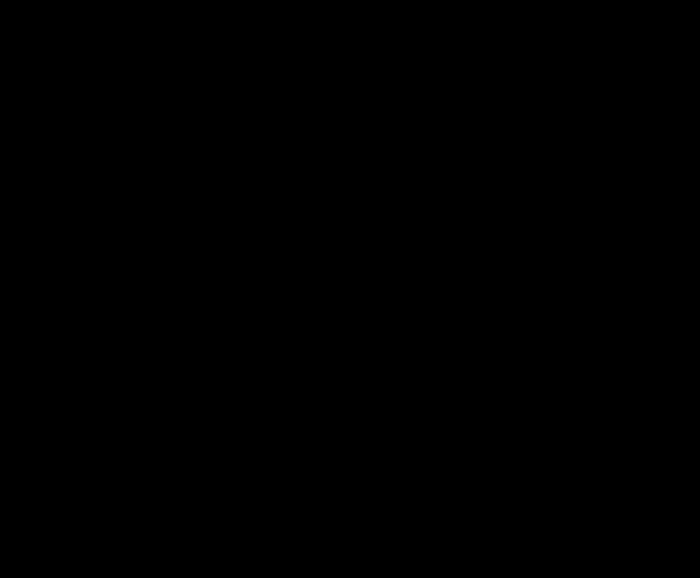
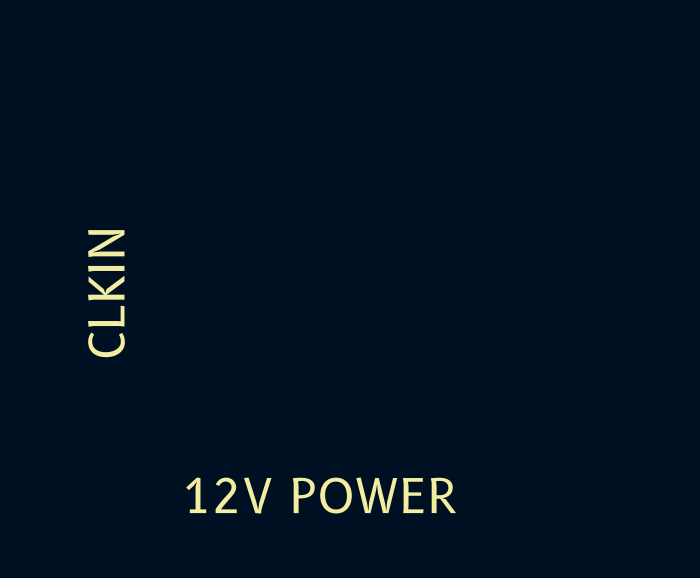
text: none -> CLKIN (106, 293)
text: none -> 12V POWER (321, 495)

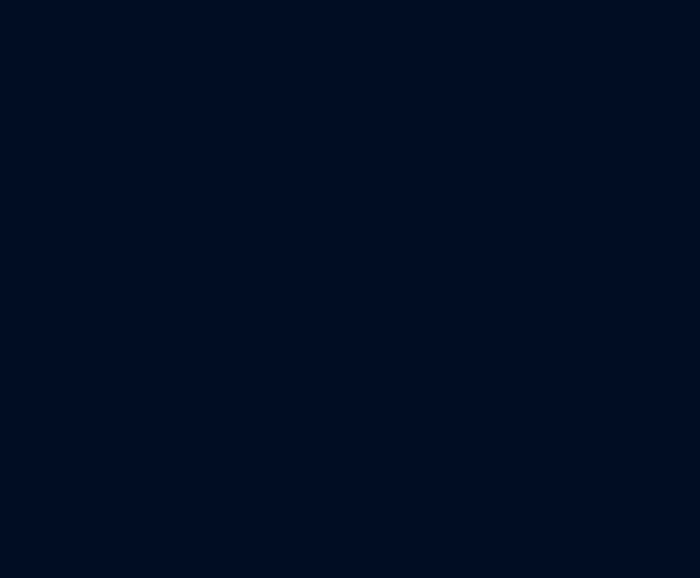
text: CLKIN (106, 293) -> none
text: 12V POWER (321, 495) -> none

